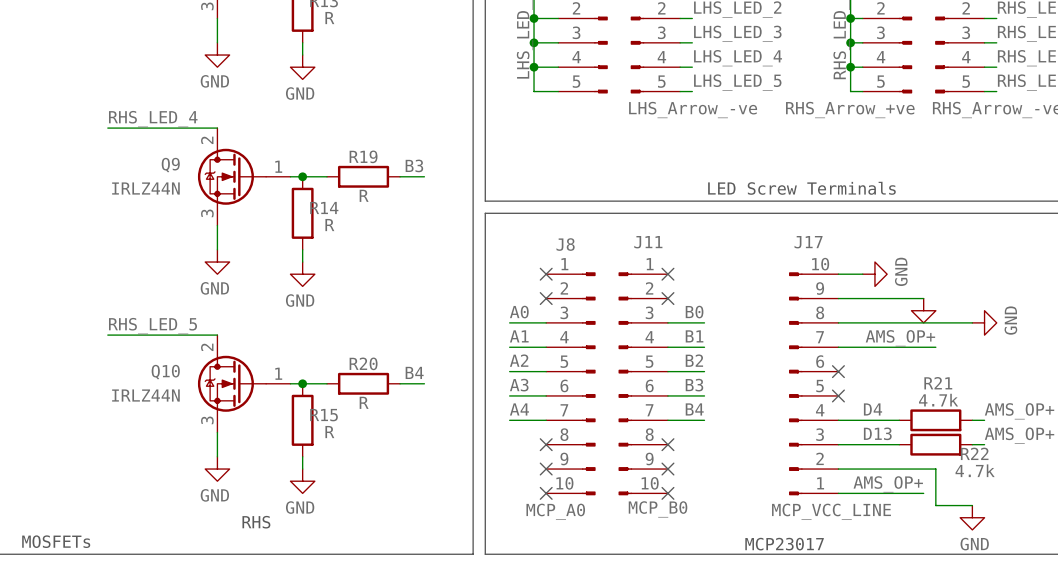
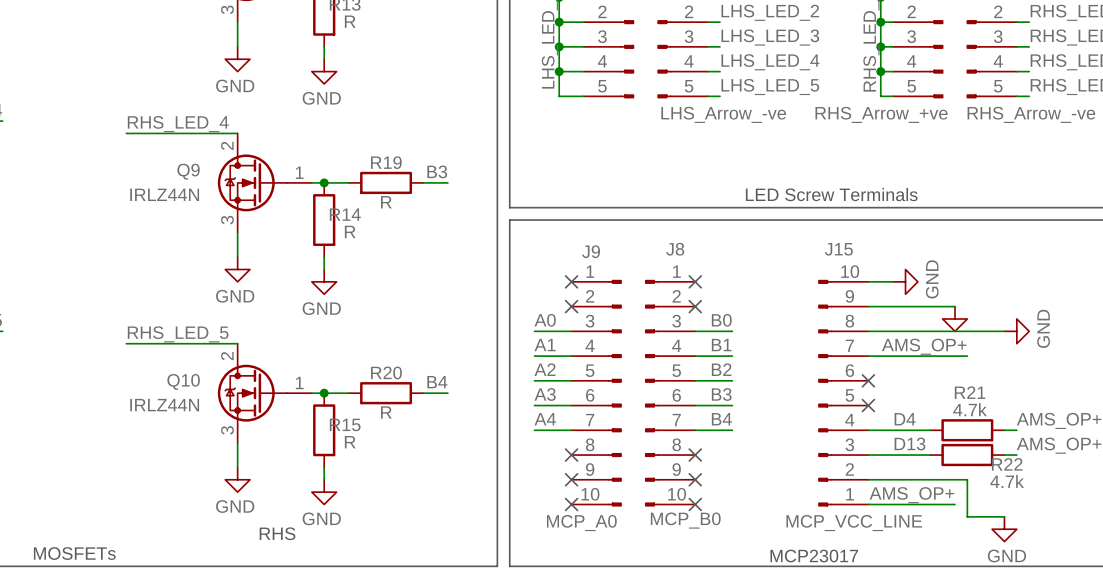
J11 name: J11 (648, 242) -> J8 (675, 249)
J17 name: J17 (808, 242) -> J15 (838, 249)
J8 name: J8 (565, 244) -> J9 (591, 251)

